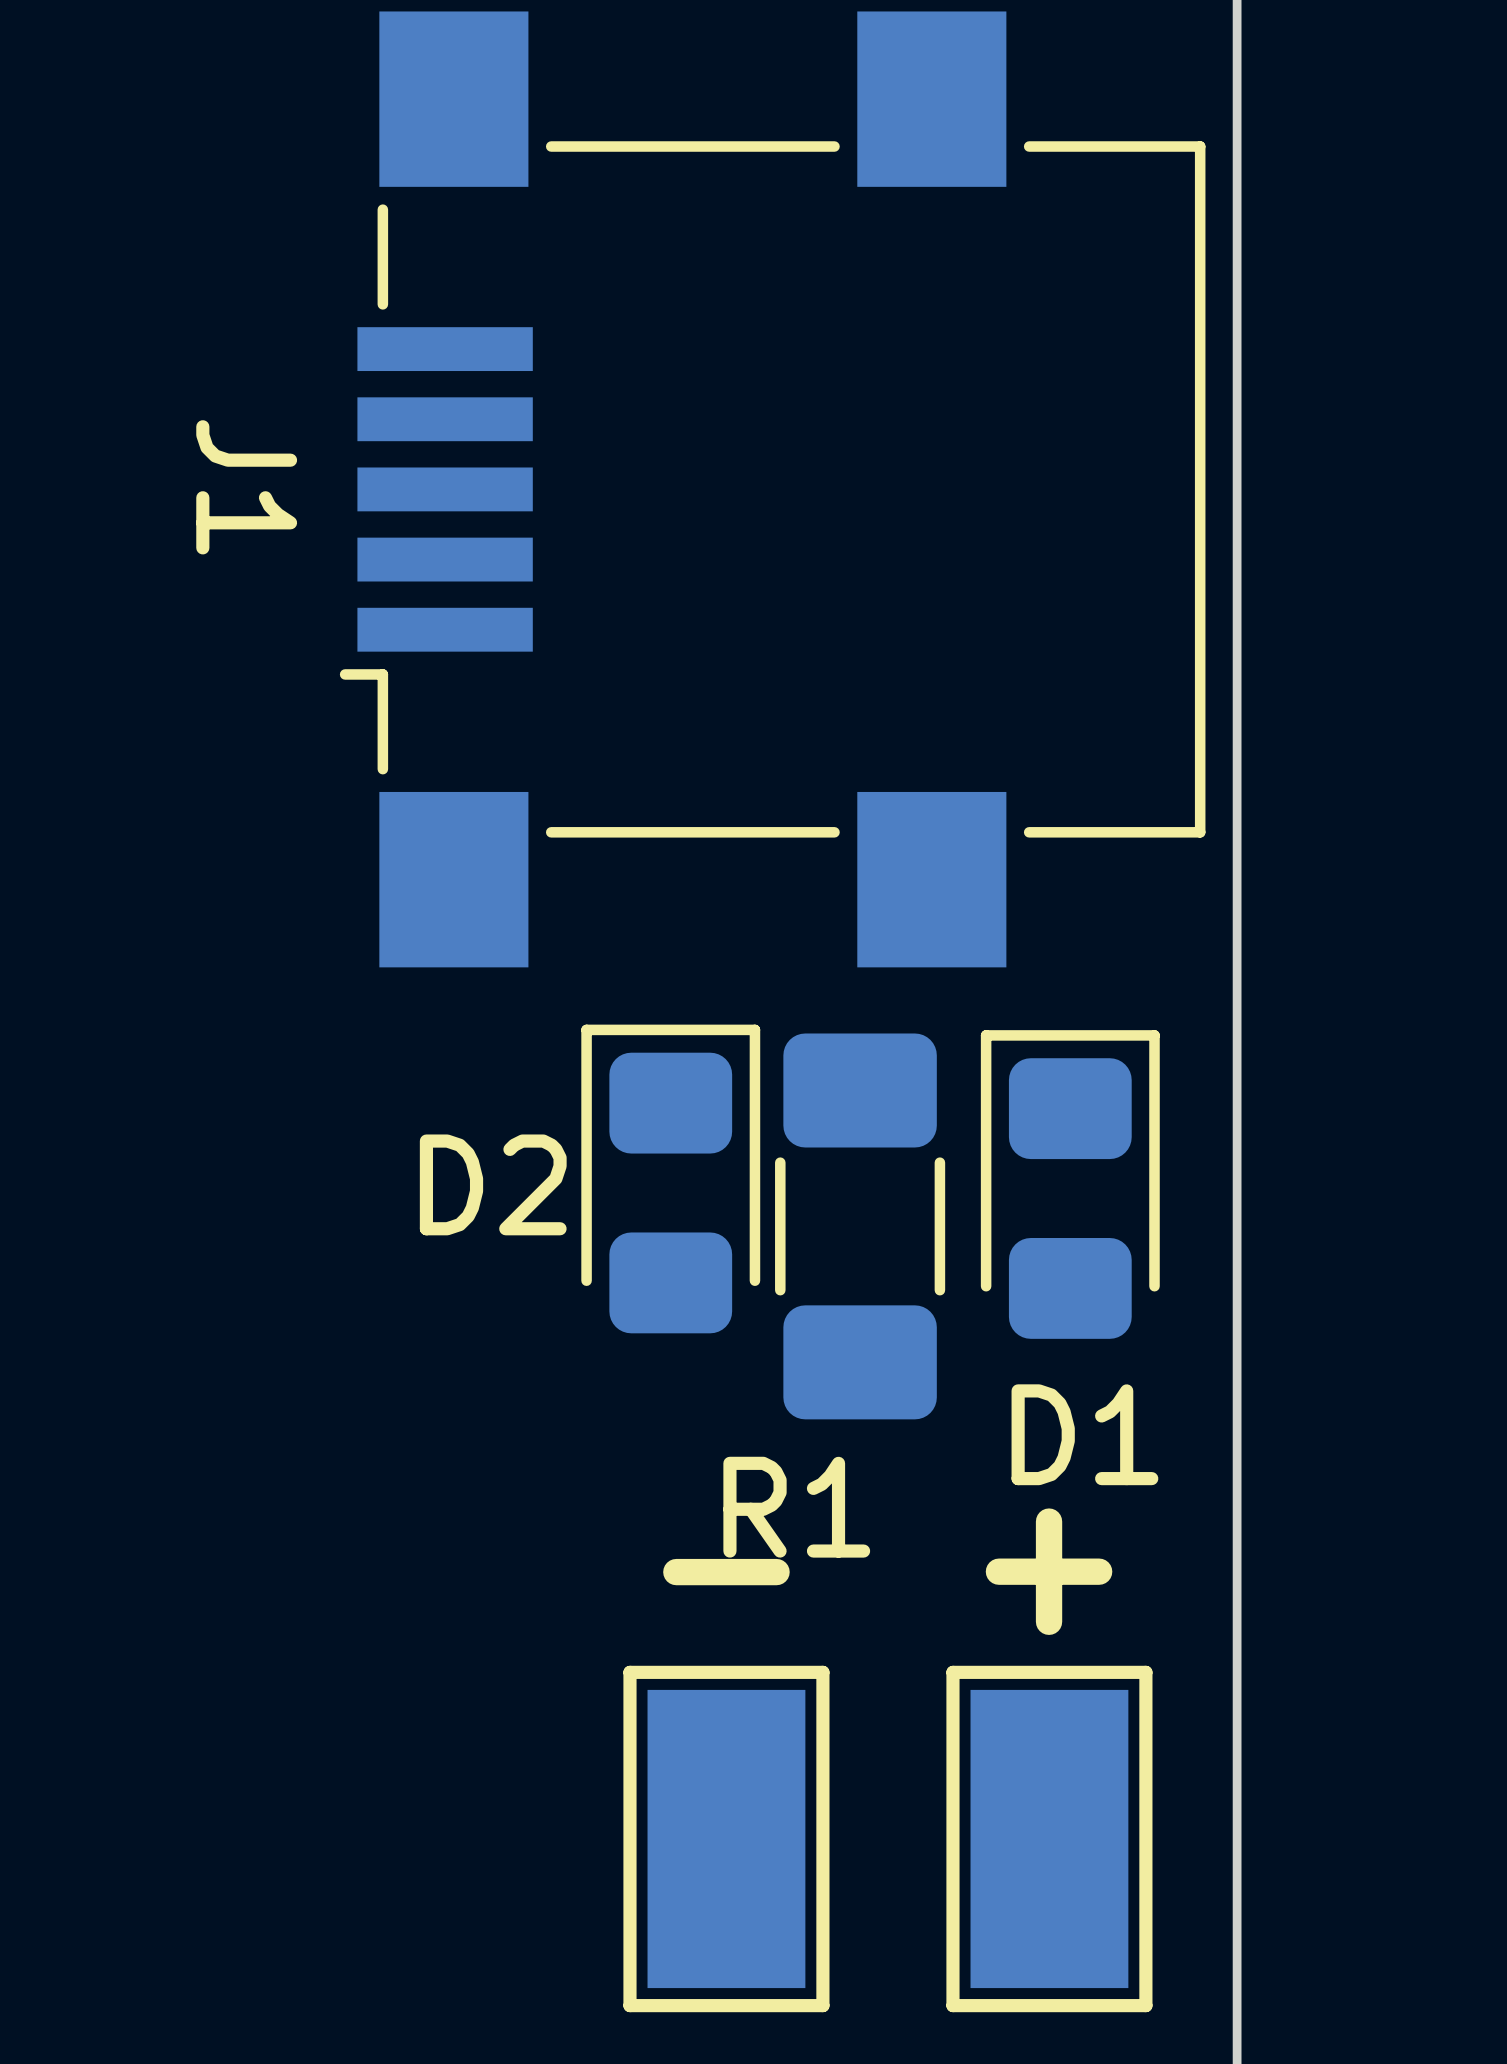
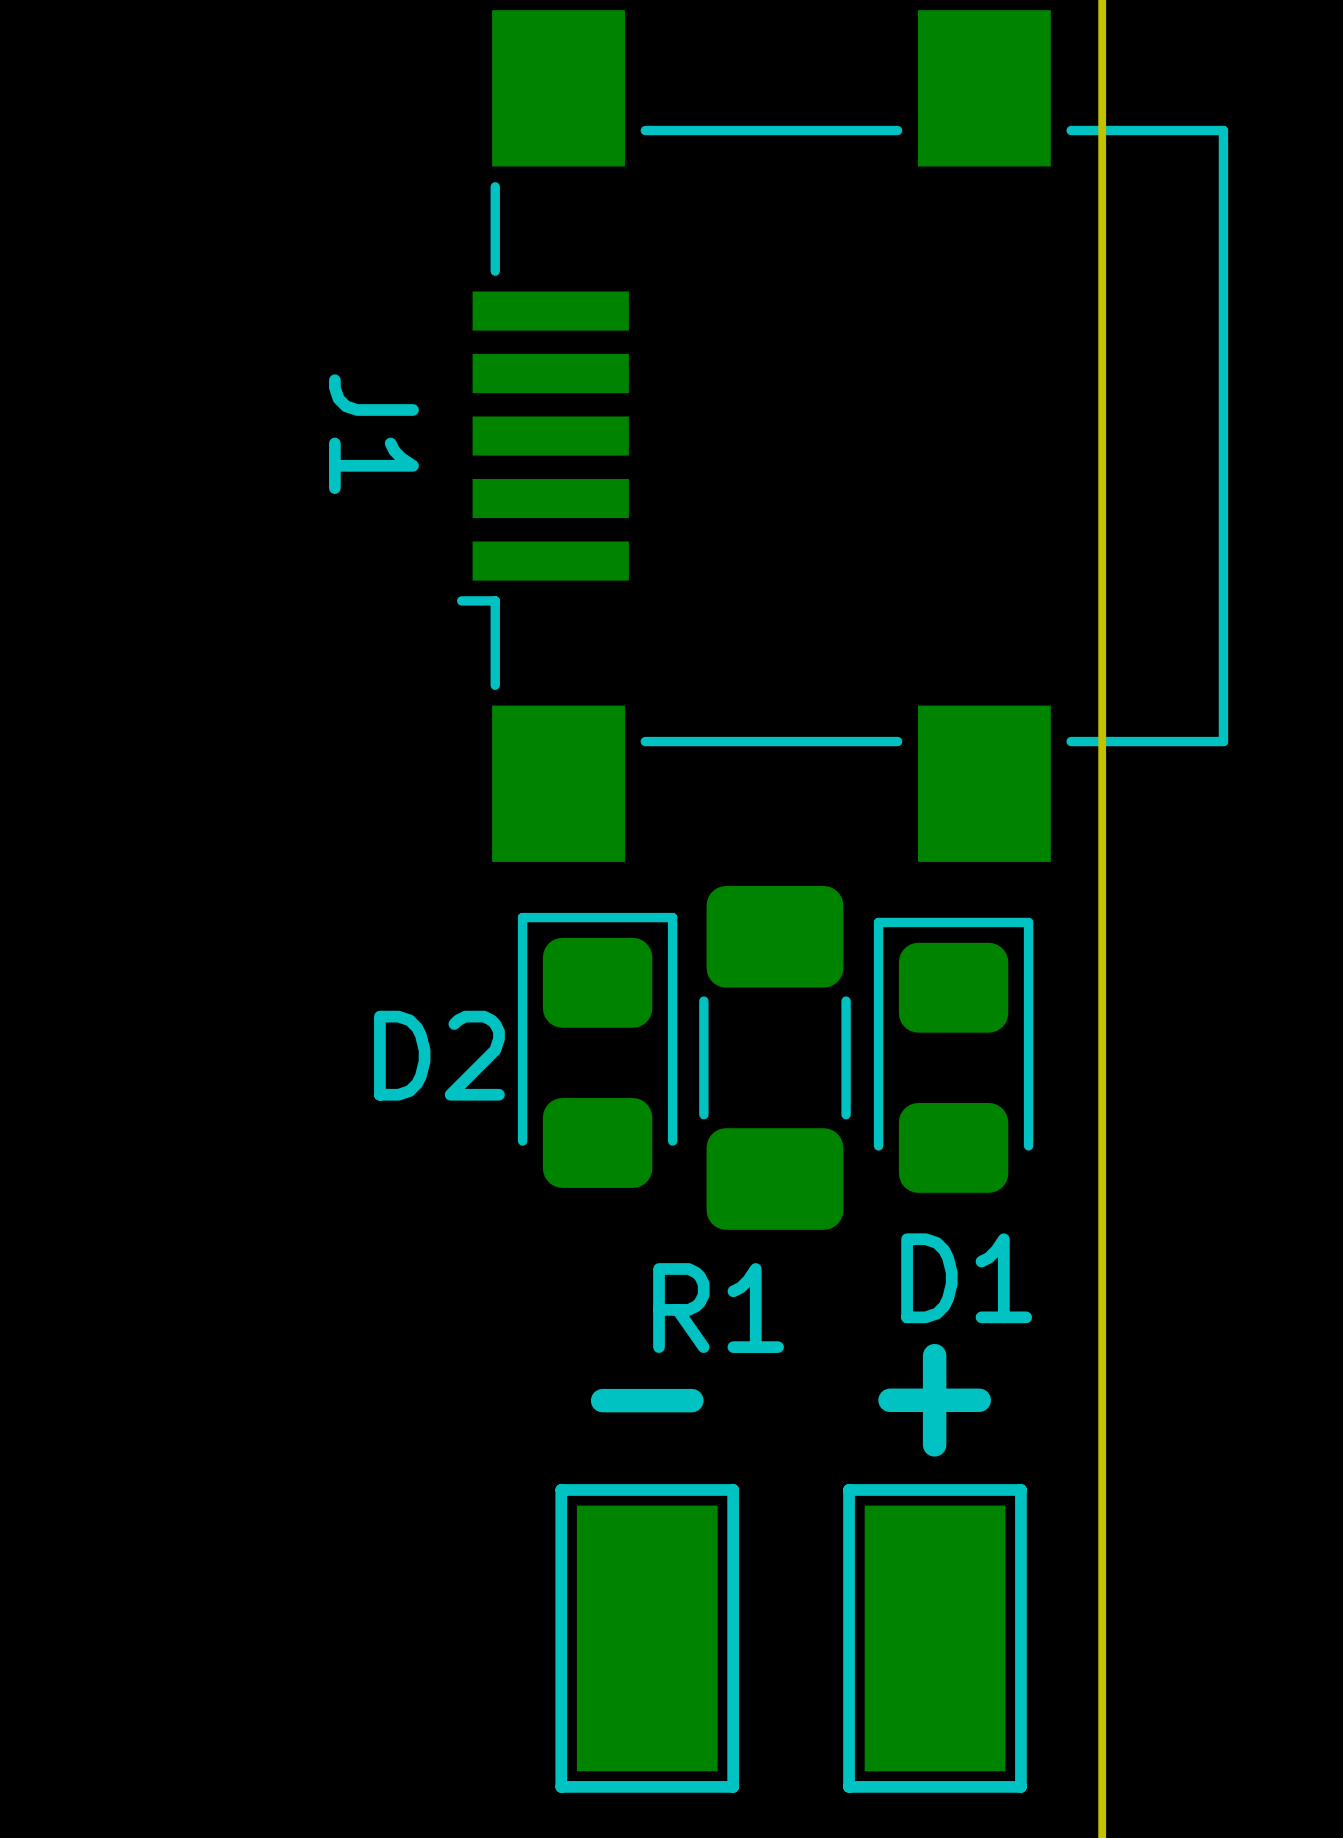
J1 position: (772, 489) -> (842, 436)
R1 position: (860, 1226) -> (774, 1057)

